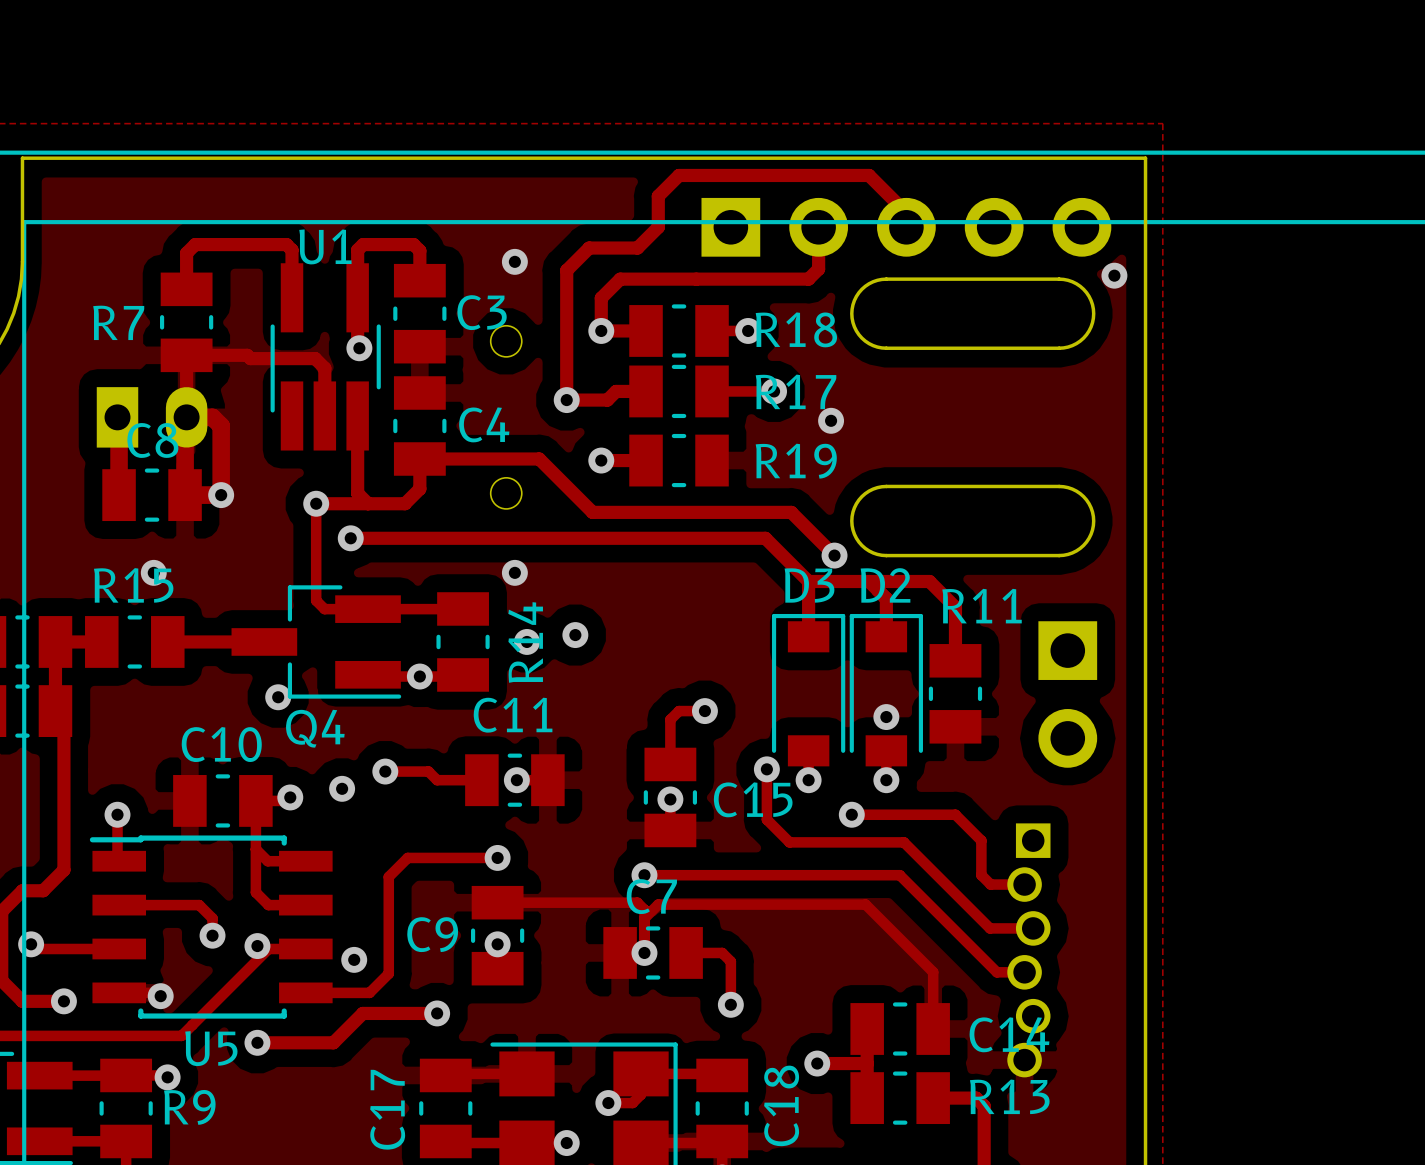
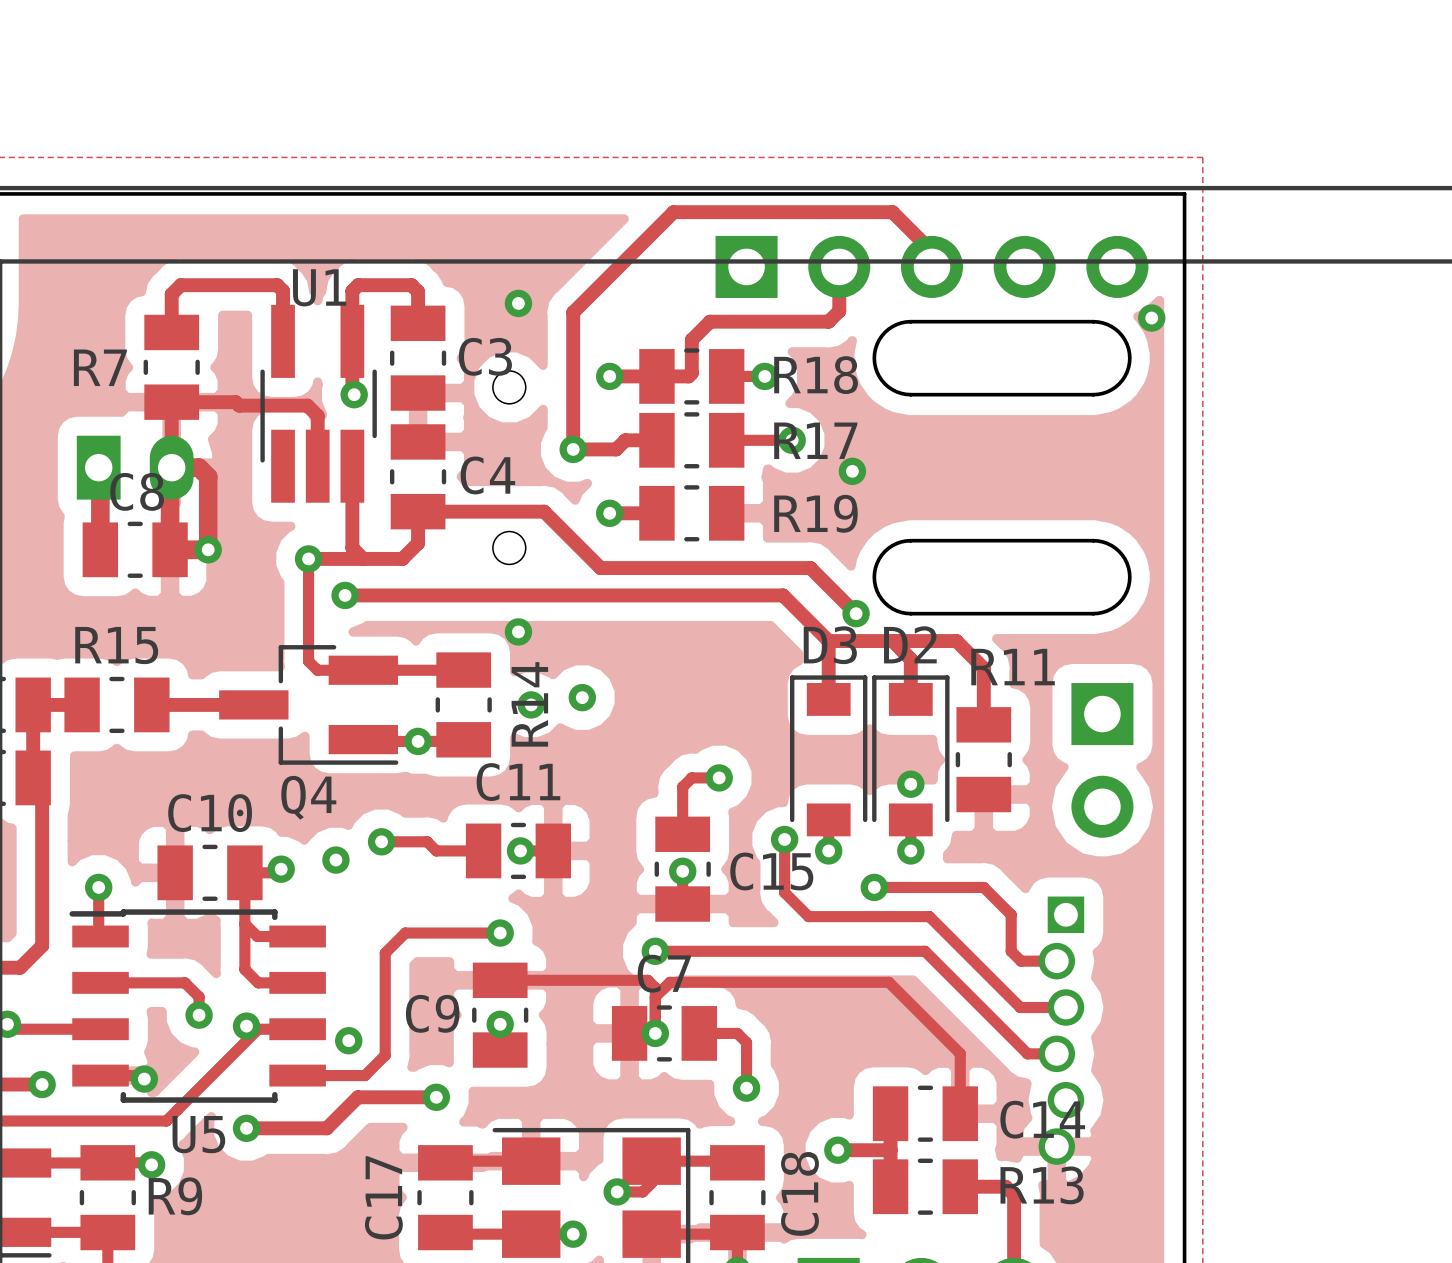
track: (679, 175) (658, 196) (658, 227) (637, 248) (589, 248) -> (691, 212) (673, 212) (596, 288)
track: (696, 279) (620, 279) (601, 298) (601, 330) -> (710, 321) (691, 339) (691, 373) (688, 376) (656, 376)
via: (153, 572) -> none
via: (278, 697) -> none

